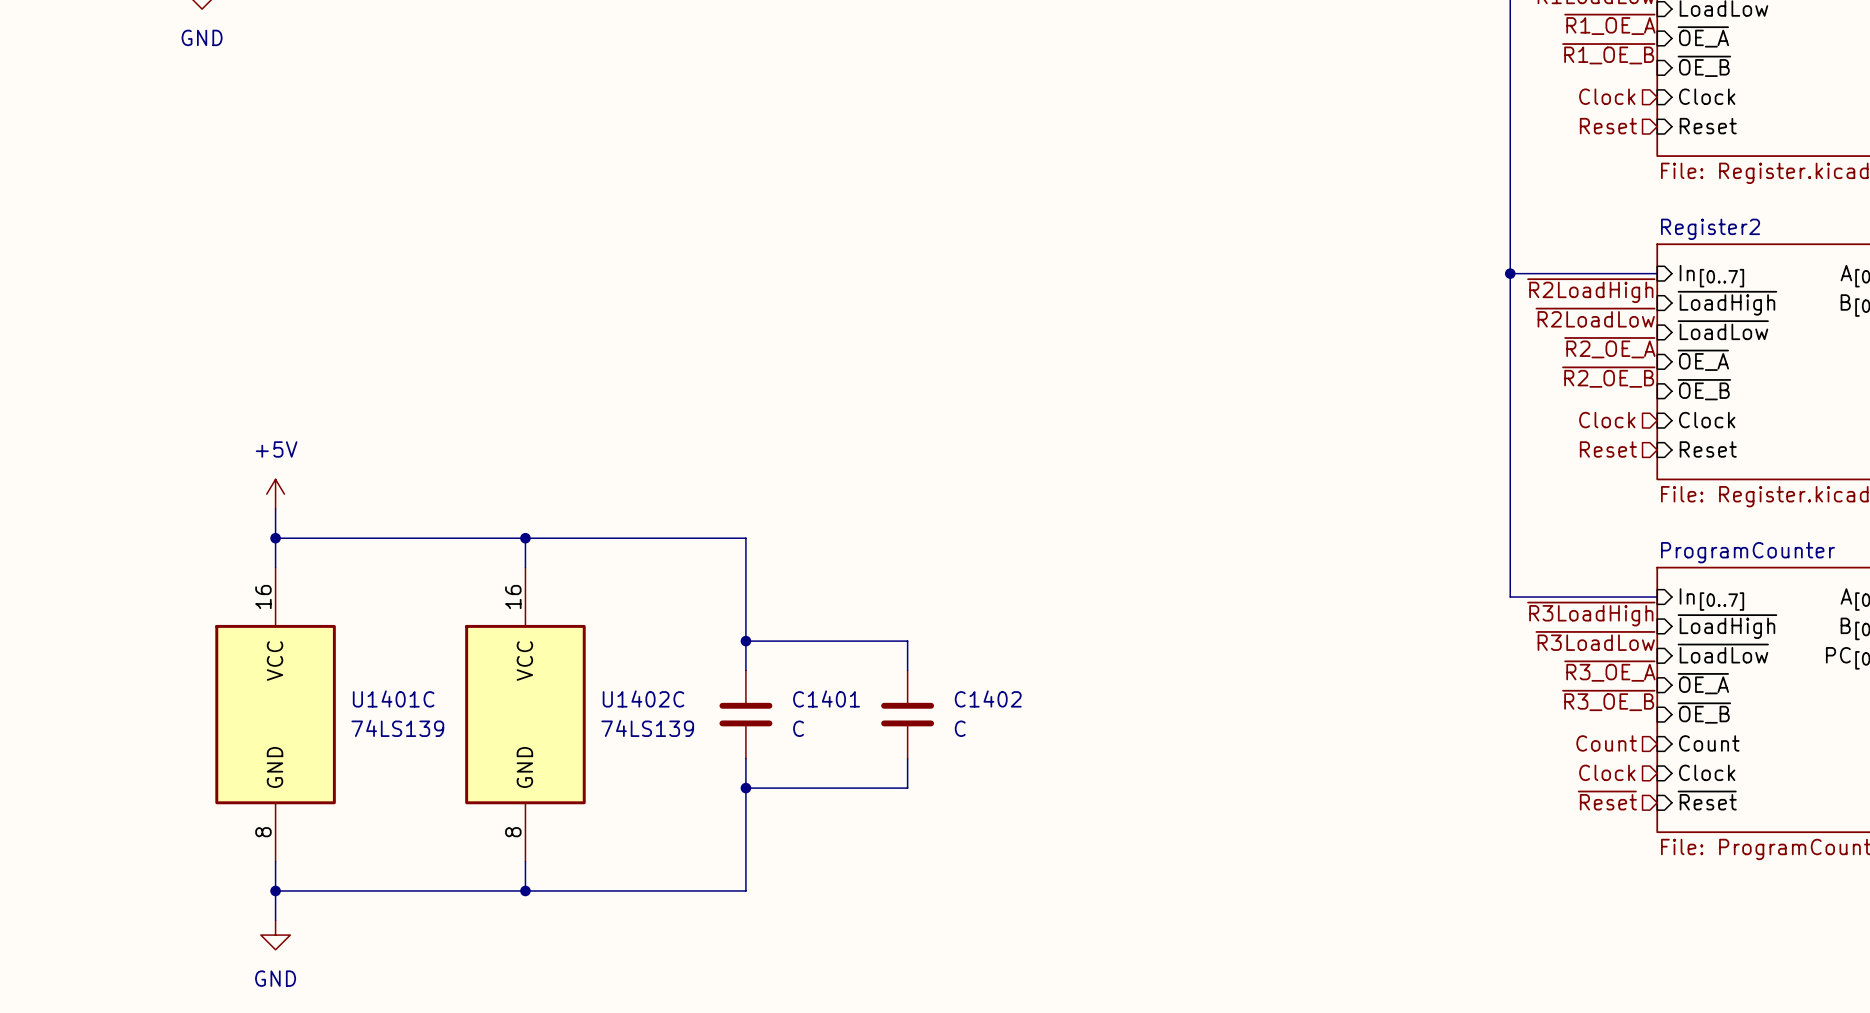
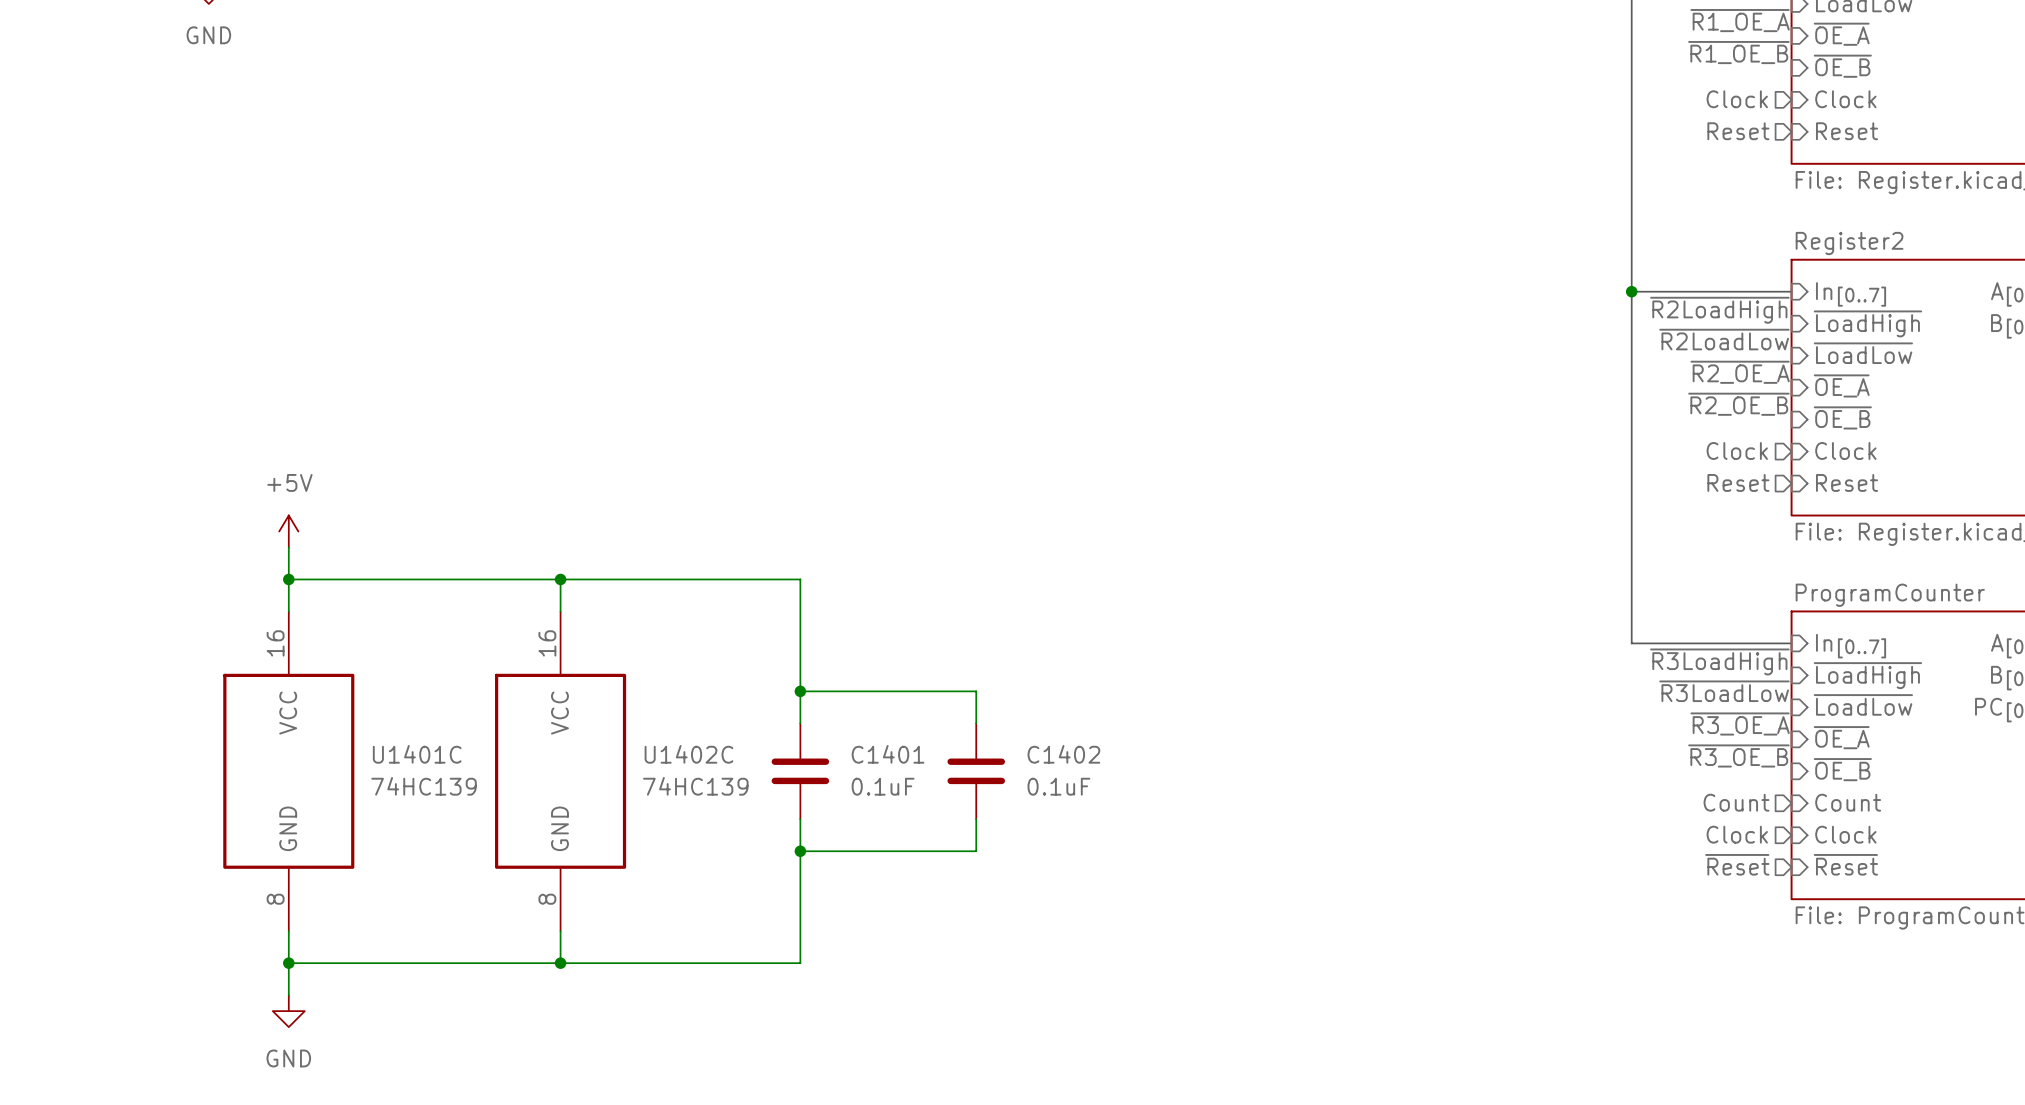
U1401C value: 74LS139 (397, 728) -> 74HC139 (424, 786)
U1402C value: 74LS139 (647, 728) -> 74HC139 (695, 786)
C1401 value: C (798, 728) -> 0.1uF (883, 786)
C1402 value: C (960, 728) -> 0.1uF (1058, 786)

